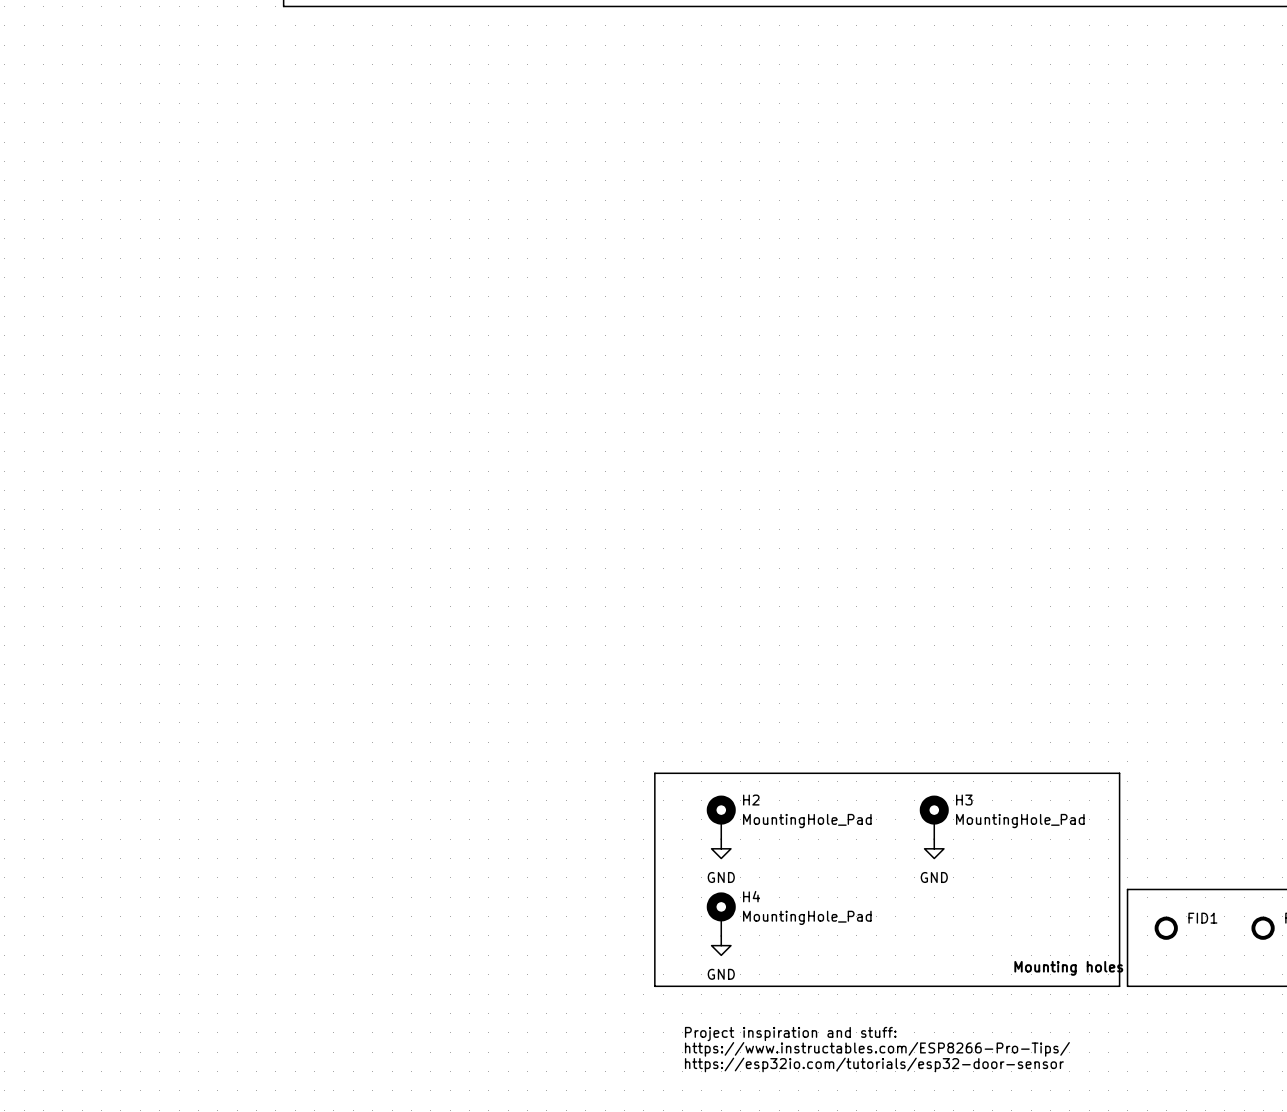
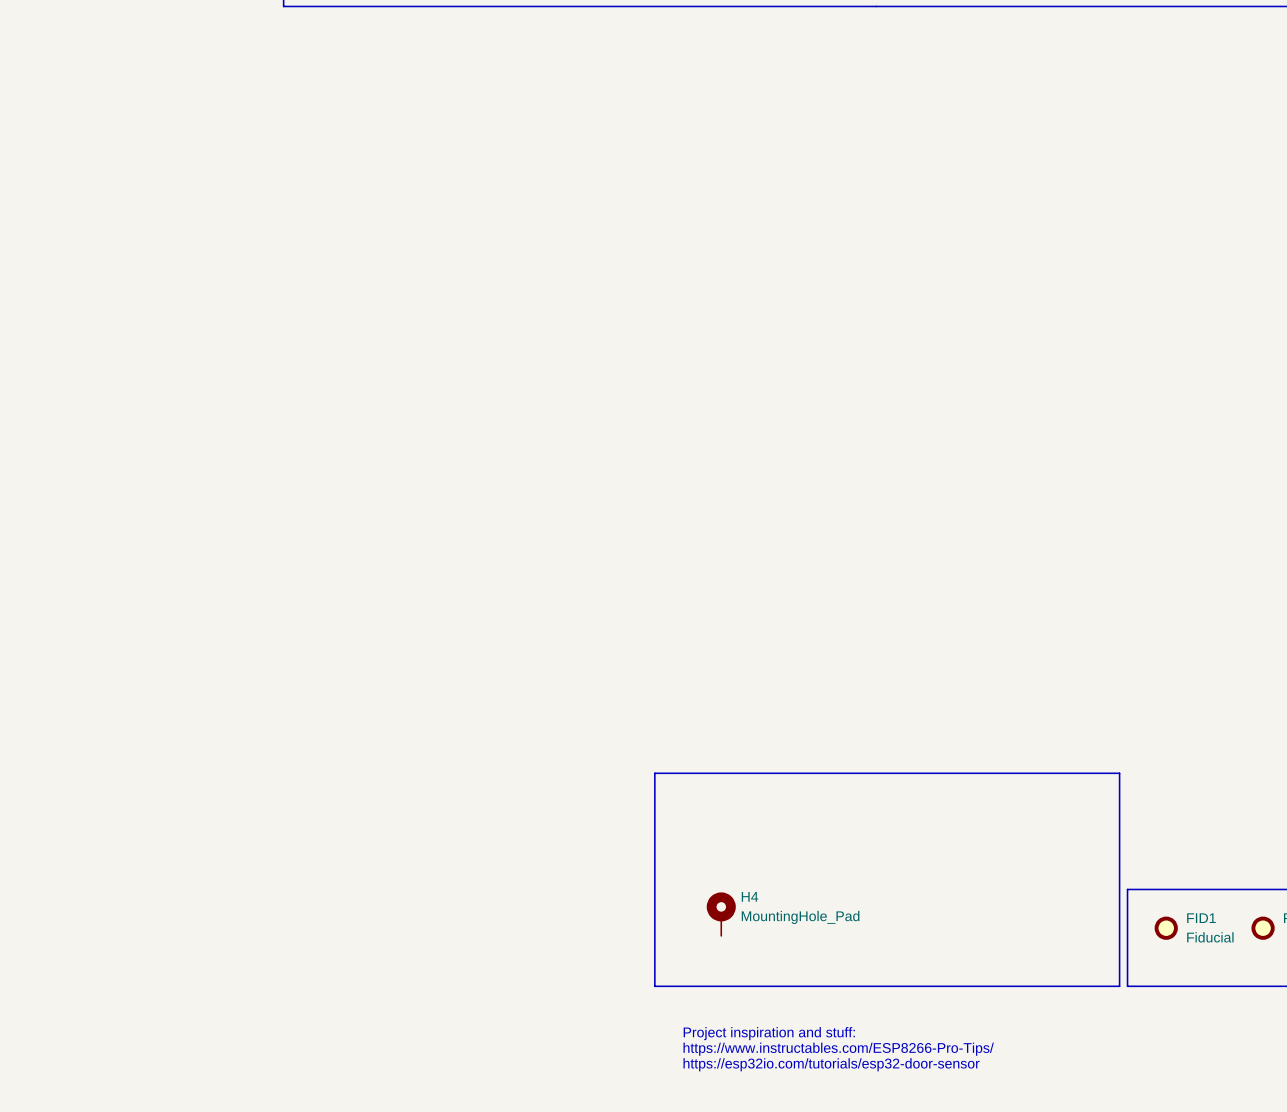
H2: MountingHole_Pad (721, 817) -> none
H3: MountingHole_Pad (934, 817) -> none
power symbol: GND (721, 848) -> none
power symbol: GND (934, 848) -> none
FID1 value: none -> Fiducial (1210, 937)
power symbol: GND (721, 945) -> none
text: Mounting holes (1068, 968) -> none

